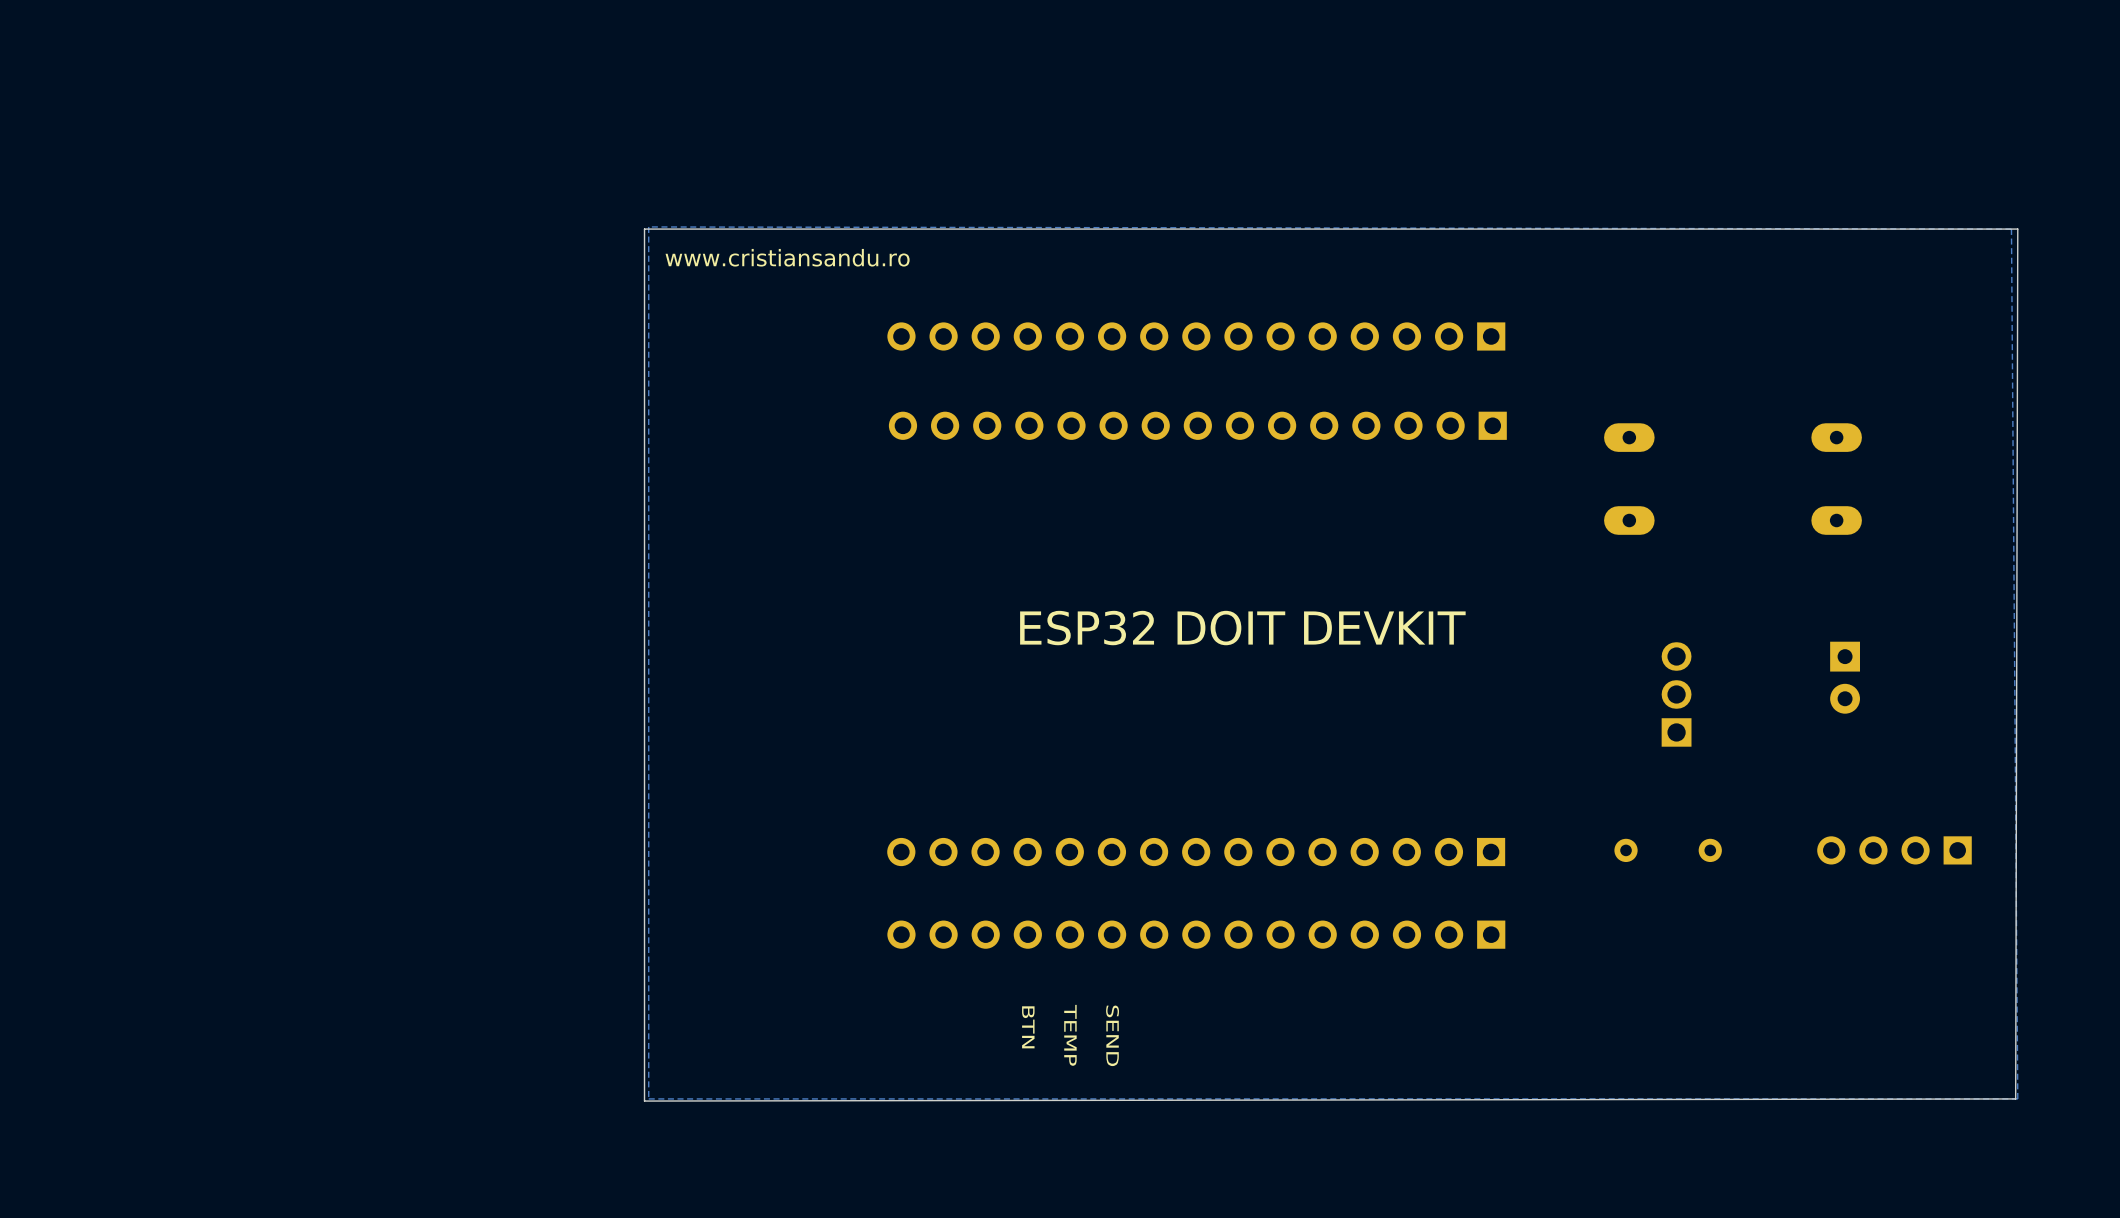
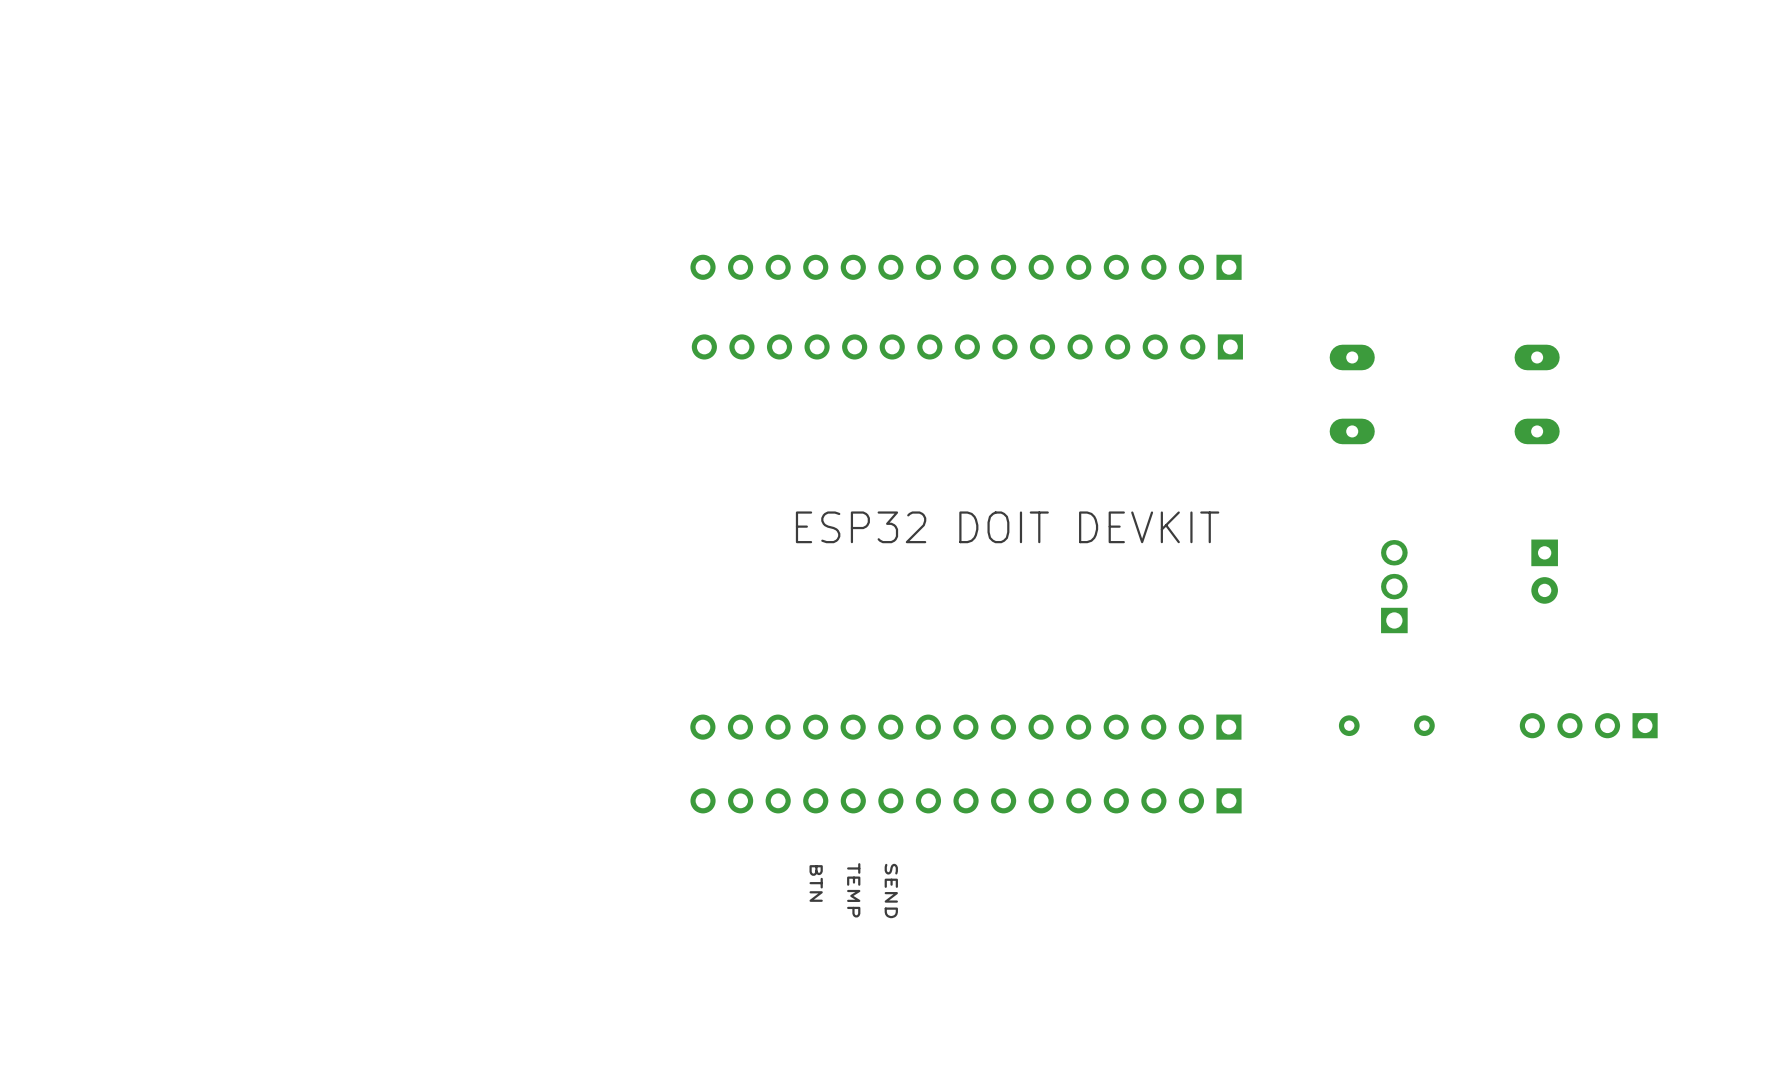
zone outline: (648, 226) (2011, 229) (2017, 1098) (648, 1098) (648, 226) -> none
board edge: (2017, 229) (644, 229) (644, 1101) (2015, 1098) (2017, 229) -> none
text: www.cristiansandu.ro (787, 257) -> none

